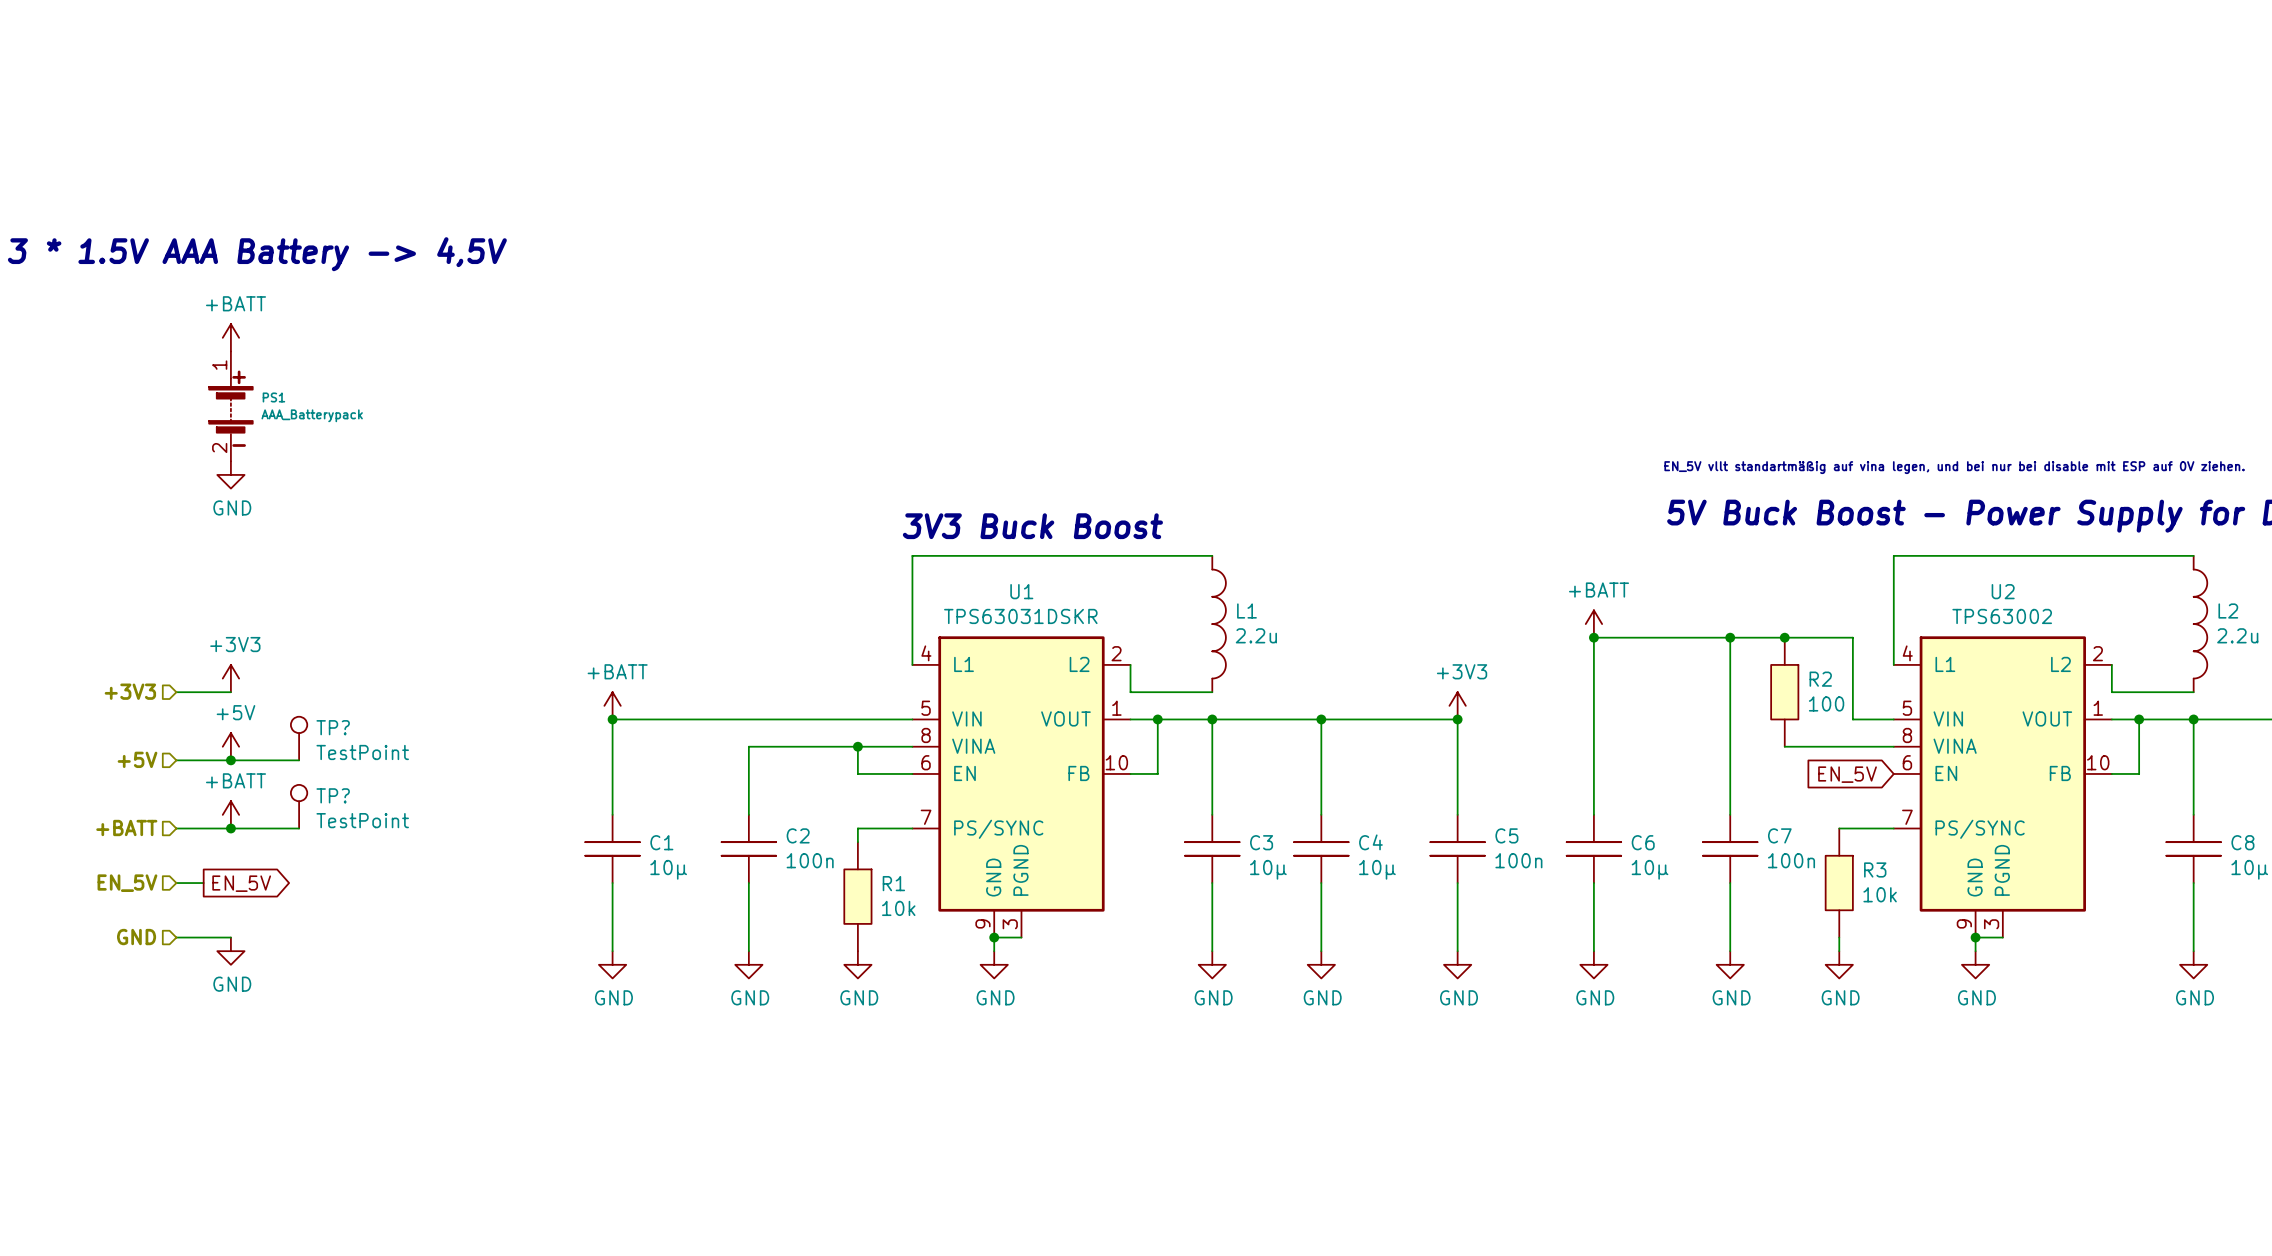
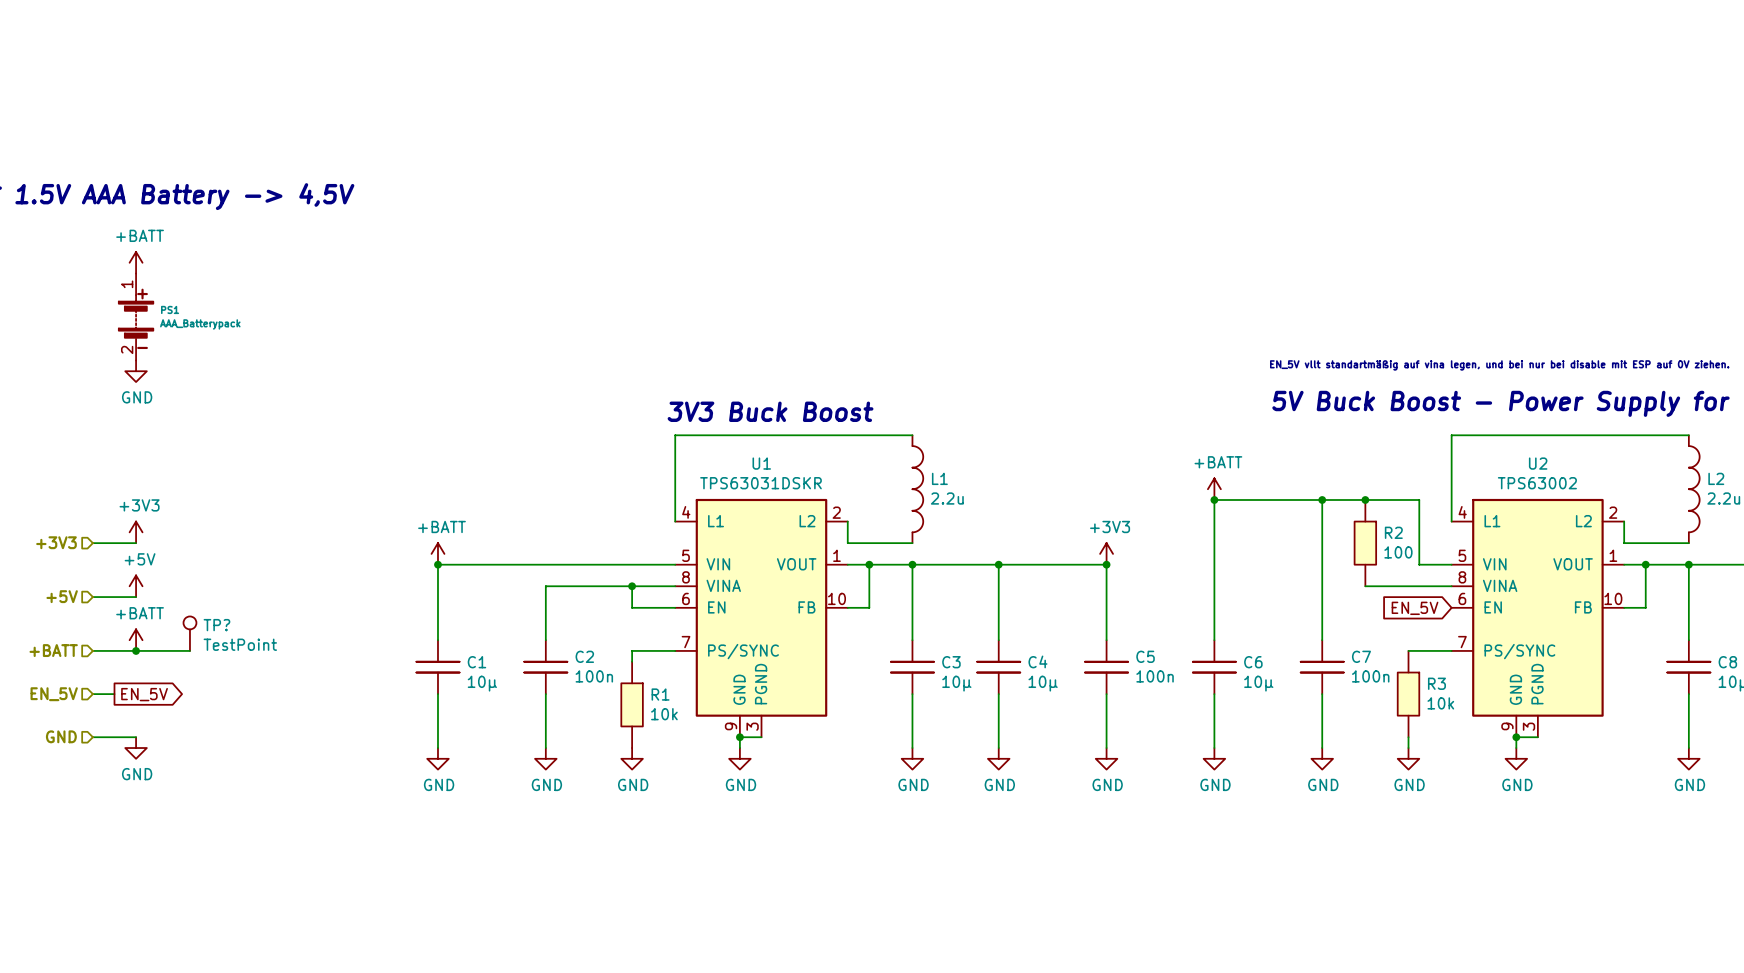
TP?: TestPoint (299, 738) -> none
wire: (230, 760) (299, 760) -> none
junction: (230, 760) -> none

